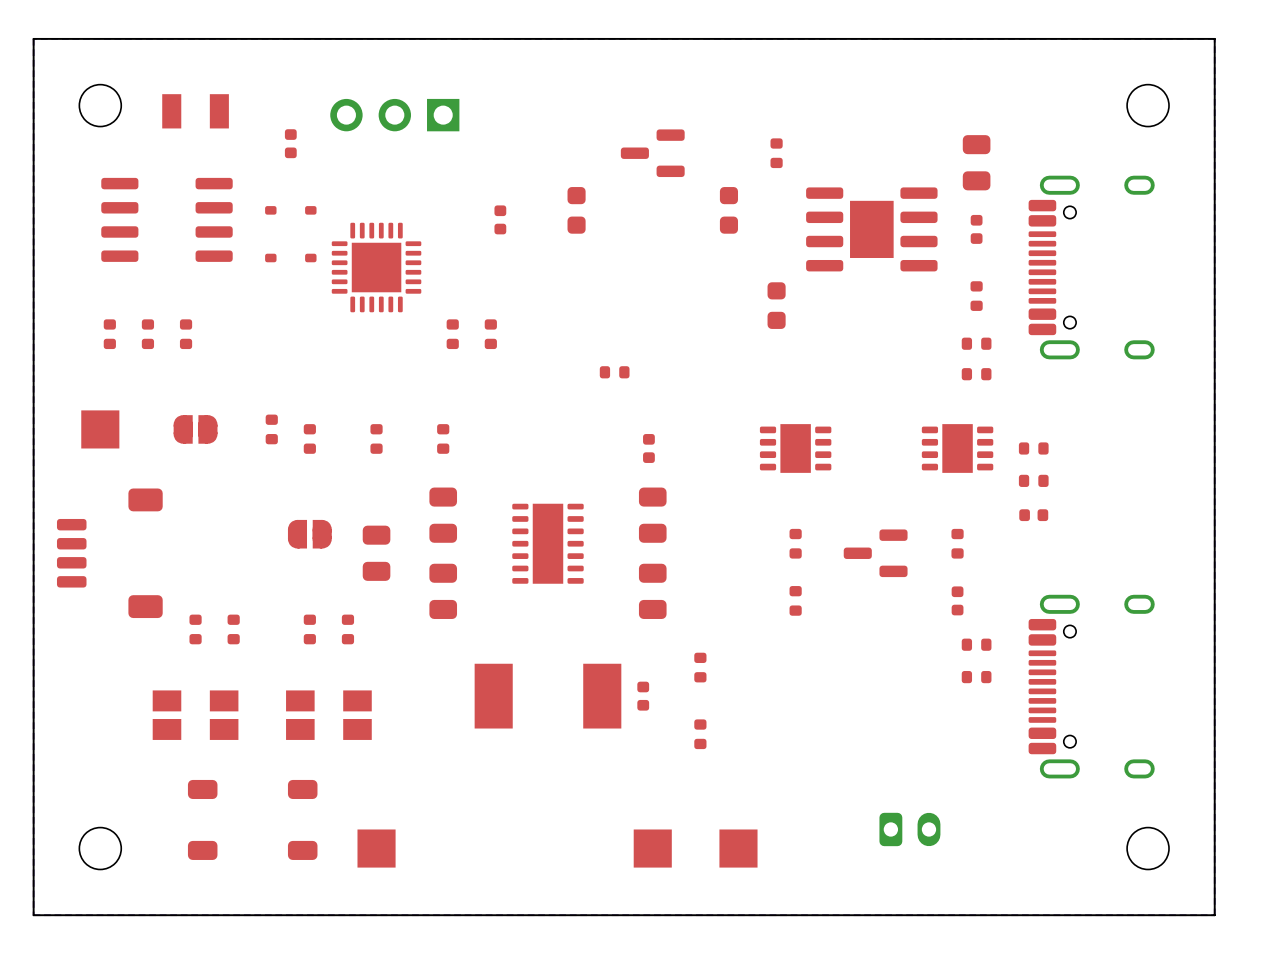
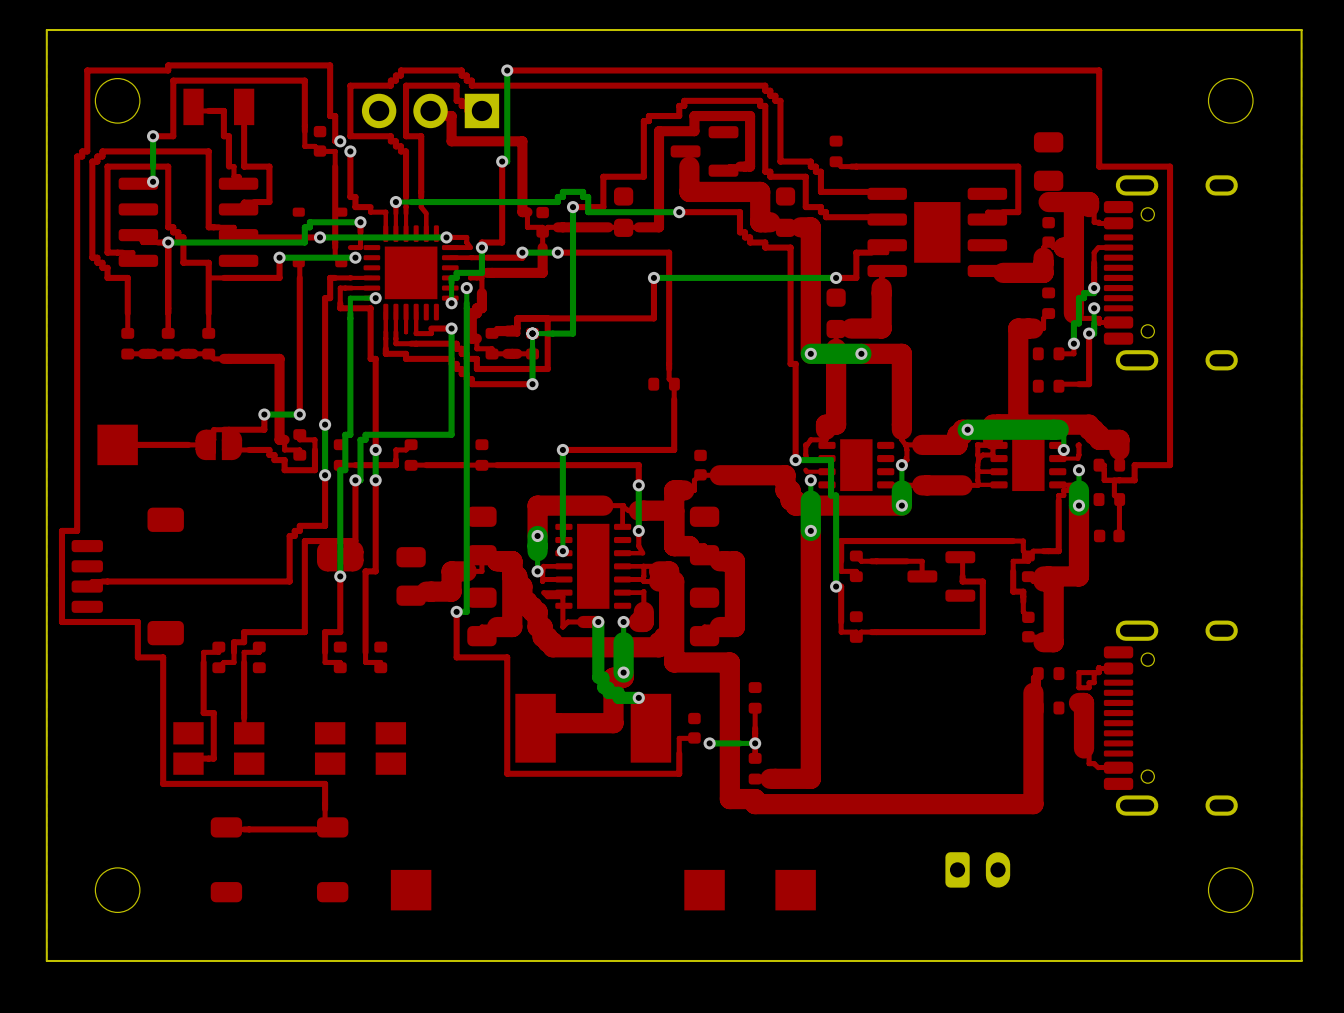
top track: none -> (507, 70) (1099, 70) (1099, 166) (1170, 166) (1170, 465) (1134, 465) (1134, 480) (1114, 480)
bottom track: none -> (507, 70) (507, 161) (502, 161)
via: none -> (507, 70)
top track: none -> (244, 105) (244, 166) (269, 166) (269, 202) (244, 202) (238, 209)
top track: none -> (193, 106) (198, 110) (223, 110) (223, 136) (228, 136) (228, 166) (234, 166) (234, 176) (239, 176) (238, 183)
top track: none -> (430, 110) (436, 116) (451, 116) (451, 141) (522, 141) (522, 212) (527, 212) (527, 227) (542, 227) (542, 272) (476, 272) (470, 277) (481, 277) (481, 308) (476, 308) (476, 313) (471, 313) (471, 338) (476, 338) (476, 348) (492, 348) (492, 354)
top track: none -> (481, 110) (466, 110) (466, 105) (461, 105) (461, 100) (456, 100) (456, 85) (406, 85) (406, 136) (421, 136) (421, 207) (426, 213) (426, 233)
top track: none -> (153, 136) (173, 136) (173, 80) (304, 80) (304, 146) (314, 146) (320, 151)
bottom track: none -> (153, 136) (153, 181)
via: none -> (153, 136)
top track: none -> (340, 141) (335, 141) (335, 116) (330, 116) (330, 65) (168, 65) (168, 70) (87, 70) (87, 151) (82, 151) (82, 156) (77, 156) (77, 530) (61, 530) (61, 621) (137, 621) (137, 657) (163, 657) (163, 783) (325, 783) (325, 824) (332, 827) (330, 829) (234, 829) (226, 827)
via: none -> (340, 141)
top track: none -> (320, 151) (335, 151) (335, 257) (340, 262)
top track: none -> (350, 151) (350, 196) (355, 196) (355, 207) (370, 207) (370, 212) (385, 212) (385, 233)
via: none -> (350, 151)
top track: none -> (684, 151) (689, 151) (689, 191) (760, 191) (760, 222) (780, 222) (785, 227) (810, 227) (810, 353)
top track: none -> (502, 161) (502, 242) (481, 242) (481, 247)
via: none -> (502, 161)
top track: none -> (836, 161) (841, 166) (1018, 166) (1018, 212) (987, 212) (987, 219)
top track: none -> (723, 170) (729, 166) (750, 166) (750, 116) (694, 116) (694, 131) (659, 131) (659, 227) (547, 227) (542, 231)
via: none -> (153, 181)
top track: none -> (887, 193) (886, 191) (820, 191) (820, 171) (815, 171) (815, 166) (810, 166) (810, 161) (780, 161) (780, 100) (775, 100) (775, 95) (770, 95) (770, 90) (765, 90) (765, 85) (471, 85) (471, 80) (466, 80) (466, 75) (461, 75) (461, 70) (400, 70) (400, 75) (395, 75) (395, 80) (390, 80) (390, 85) (350, 85) (350, 136) (390, 136) (390, 141) (395, 141) (395, 146) (400, 146) (400, 151) (406, 151) (406, 233)
top track: none -> (395, 202) (395, 233)
bottom track: none -> (395, 202) (557, 202) (557, 196) (562, 196) (562, 191) (583, 191) (583, 196) (588, 196) (588, 212) (679, 212)
via: none -> (395, 202)
top track: none -> (1063, 202) (1048, 202) (1089, 202) (1089, 207) (1094, 207) (1094, 222) (1118, 223)
top track: none -> (1073, 202) (1073, 313) (1078, 318) (1099, 318) (1099, 323) (1118, 322)
top track: none -> (573, 207) (603, 207) (603, 176) (643, 176) (643, 121) (648, 121) (648, 116) (679, 116) (679, 105) (684, 105) (684, 100) (760, 100) (760, 105) (765, 105) (765, 171) (770, 171) (770, 176) (805, 176) (805, 207) (820, 207) (820, 212) (825, 212) (825, 217) (886, 217) (887, 219)
bottom track: none -> (573, 207) (573, 333) (532, 333) (532, 384)
via: none -> (573, 207)
top track: none -> (679, 212) (739, 212) (739, 232) (745, 232) (745, 237) (750, 237) (750, 242) (765, 242) (765, 247) (790, 247) (790, 363) (795, 363) (795, 460)
via: none -> (679, 212)
top track: none -> (360, 222) (360, 247) (350, 247)
bottom track: none -> (360, 222) (309, 222) (309, 227) (304, 227) (304, 242) (168, 242)
via: none -> (360, 222)
top track: none -> (138, 235) (142, 242) (168, 242) (168, 333)
top track: none -> (320, 237) (239, 237) (234, 232) (234, 227) (208, 227) (208, 151) (102, 151) (102, 156) (97, 156) (97, 161) (92, 161) (92, 257) (97, 257) (97, 262) (102, 262) (102, 267) (107, 267) (107, 277) (127, 277) (127, 333)
via: none -> (320, 237)
top track: none -> (446, 237) (466, 237) (466, 242) (470, 247) (450, 247)
bottom track: none -> (446, 237) (320, 237)
via: none -> (446, 237)
via: none -> (168, 242)
top track: none -> (887, 245) (886, 252) (856, 252) (856, 277) (836, 277)
bottom track: none -> (481, 247) (481, 272) (456, 272) (456, 277) (451, 277) (451, 303)
via: none -> (481, 247)
top track: none -> (1073, 247) (1053, 247) (1048, 242) (1043, 247) (1043, 272) (987, 272) (987, 270)
top track: none -> (1118, 247) (1098, 247) (1094, 252) (1094, 288)
top track: none -> (522, 252) (522, 257) (450, 257)
via: none -> (522, 252)
top track: none -> (557, 252) (669, 252) (669, 379) (674, 384)
bottom track: none -> (557, 252) (522, 252)
via: none -> (557, 252)
top track: none -> (279, 257) (279, 277) (208, 277) (208, 262)
via: none -> (279, 257)
bottom track: none -> (355, 257) (279, 257)
via: none -> (355, 257)
top track: none -> (138, 260) (132, 257) (132, 252) (107, 252) (107, 166) (168, 166) (168, 227) (173, 227) (173, 232) (178, 232) (178, 237) (183, 237) (183, 262) (208, 262)
top track: none -> (208, 262) (208, 333)
top track: none -> (298, 262) (299, 414)
top track: none -> (887, 270) (881, 277) (881, 328) (836, 328) (836, 424) (825, 424) (825, 439) (810, 439) (805, 444) (806, 458)
top track: none -> (371, 277) (330, 277) (330, 298) (325, 298) (325, 424)
top track: none -> (653, 277) (653, 318) (517, 318) (517, 333) (492, 333)
via: none -> (653, 277)
bottom track: none -> (836, 277) (653, 277)
via: none -> (836, 277)
top track: none -> (371, 288) (340, 288) (340, 308) (370, 308) (370, 358) (375, 358) (375, 449)
bottom track: none -> (466, 288) (466, 611) (456, 611)
via: none -> (466, 288)
bottom track: none -> (1094, 288) (1094, 293) (1084, 293) (1084, 298) (1078, 298) (1078, 323) (1073, 323) (1073, 343)
via: none -> (1094, 288)
bottom track: none -> (375, 298) (350, 298) (350, 434) (345, 434) (345, 470) (340, 470) (340, 576)
via: none -> (375, 298)
via: none -> (451, 303)
bottom track: none -> (1094, 308) (1094, 333) (1089, 333)
via: none -> (1094, 308)
top track: none -> (385, 312) (385, 353) (406, 353) (406, 358) (451, 358) (451, 363) (456, 363) (456, 369) (461, 369) (461, 374) (466, 374) (466, 379) (471, 379) (471, 384) (532, 384)
top track: none -> (395, 312) (395, 343) (456, 343) (456, 348) (461, 348) (461, 353) (466, 353) (466, 358) (476, 358) (476, 369) (547, 369) (547, 318)
top track: none -> (406, 312) (406, 332)
top track: none -> (416, 312) (416, 333) (431, 333) (431, 328) (451, 328)
top track: none -> (1048, 313) (1043, 318) (1043, 328) (1018, 328) (1018, 424)
bottom track: none -> (451, 328) (451, 434) (365, 434) (365, 439) (360, 439) (360, 480) (355, 480)
via: none -> (451, 328)
top track: none -> (517, 328) (497, 328) (492, 333)
via: none -> (532, 333)
top track: none -> (1089, 333) (1089, 384) (1058, 384) (1058, 386)
via: none -> (1089, 333)
top track: none -> (1073, 343) (1073, 353) (1058, 353)
via: none -> (1073, 343)
top track: none -> (127, 354) (203, 353) (208, 354) (213, 358) (279, 358) (279, 439) (284, 439) (284, 449) (299, 449) (299, 455)
top track: none -> (492, 353) (532, 354)
via: none -> (810, 353)
top track: none -> (861, 353) (901, 353) (901, 439) (905, 445)
bottom track: none -> (861, 353) (810, 353)
via: none -> (861, 353)
via: none -> (532, 384)
top track: none -> (674, 384) (674, 449) (562, 449)
top track: none -> (264, 414) (264, 429) (213, 429) (213, 439) (208, 439) (205, 444) (117, 444)
via: none -> (264, 414)
bottom track: none -> (299, 414) (264, 414)
via: none -> (299, 414)
bottom track: none -> (325, 424) (325, 475)
via: none -> (325, 424)
top track: none -> (967, 429) (962, 429) (962, 434) (957, 434) (957, 444) (905, 445)
bottom track: none -> (967, 429) (1063, 429) (1063, 449)
via: none -> (967, 429)
top track: none -> (299, 434) (299, 439) (314, 439) (314, 470) (284, 470) (284, 460) (274, 460) (274, 455) (269, 455) (269, 449) (239, 449) (231, 444)
top track: none -> (411, 444) (406, 449) (395, 449) (395, 465) (340, 465)
top track: none -> (905, 445) (906, 460) (905, 458)
top track: none -> (977, 444) (978, 458)
top track: none -> (1077, 445) (1077, 458) (1057, 458)
bottom track: none -> (375, 449) (375, 480)
via: none -> (375, 449)
bottom track: none -> (562, 449) (562, 551)
via: none -> (562, 449)
via: none -> (1063, 449)
top track: none -> (978, 458) (978, 484)
top track: none -> (978, 458) (982, 455) (992, 455) (992, 424) (1089, 424) (1089, 429) (1094, 429) (1094, 434) (1099, 434) (1099, 439) (1119, 439) (1119, 465)
bottom track: none -> (795, 460) (831, 460) (831, 495) (836, 495) (836, 586)
via: none -> (795, 460)
top track: none -> (411, 465) (481, 465)
top track: none -> (481, 465) (638, 465) (638, 485)
bottom track: none -> (901, 465) (901, 505)
via: none -> (901, 465)
top track: none -> (805, 470) (827, 471)
top track: none -> (977, 470) (999, 471)
bottom track: none -> (1078, 470) (1078, 505)
via: none -> (1078, 470)
top track: none -> (1104, 470) (1099, 465) (1104, 465) (1104, 480) (1114, 480)
top track: none -> (325, 475) (325, 525) (299, 525) (299, 530) (294, 530) (294, 535) (289, 535) (289, 581) (92, 581) (87, 586)
via: none -> (325, 475)
top track: none -> (355, 480) (355, 541) (304, 541) (304, 632) (244, 632) (244, 642) (234, 642) (234, 662) (223, 662) (218, 667)
via: none -> (355, 480)
top track: none -> (375, 480) (375, 571) (365, 571) (365, 662) (380, 662) (380, 667)
via: none -> (375, 480)
bottom track: none -> (810, 480) (810, 530)
via: none -> (810, 480)
top track: none -> (1114, 480) (1114, 495) (1119, 499) (1119, 535)
bottom track: none -> (638, 485) (638, 530)
via: none -> (638, 485)
top track: none -> (978, 484) (885, 484)
top track: none -> (999, 484) (978, 484)
top track: none -> (1057, 484) (1078, 485) (1068, 485) (1068, 490) (1063, 490) (1063, 495) (1058, 495) (1058, 551) (1033, 551) (1028, 556)
top track: none -> (901, 505) (795, 505) (795, 500) (790, 500) (790, 490) (785, 490) (785, 475) (700, 474) (694, 480) (694, 490) (674, 490) (674, 546) (704, 546) (704, 556)
via: none -> (901, 505)
top track: none -> (1078, 505) (1078, 576) (1028, 576) (1033, 581) (1053, 581) (1053, 642) (1043, 642) (1043, 637) (1028, 637)
via: none -> (1078, 505)
top track: none -> (622, 506) (622, 526)
top track: none -> (622, 506) (537, 505) (537, 535)
top track: none -> (622, 506) (628, 510) (674, 510)
top track: none -> (638, 530) (638, 546) (642, 553) (622, 553)
via: none -> (638, 530)
top track: none -> (810, 530) (810, 778) (755, 779)
via: none -> (810, 530)
bottom track: none -> (537, 535) (537, 571)
via: none -> (537, 535)
via: none -> (562, 551)
top track: none -> (704, 555) (709, 561) (734, 561) (734, 627) (704, 627) (704, 637)
top track: none -> (856, 556) (861, 561) (922, 561) (922, 576)
top track: none -> (1028, 556) (1028, 561) (1013, 561) (1013, 591) (1023, 591) (1023, 611) (1028, 617)
top track: none -> (1028, 556) (1023, 551) (1023, 541) (841, 541) (841, 571) (856, 571) (856, 576)
top track: none -> (960, 557) (962, 556) (962, 581) (982, 581) (982, 632) (861, 632) (856, 637) (856, 632) (841, 632) (841, 586) (836, 586)
top track: none -> (543, 566) (542, 581) (543, 579) (563, 579)
top track: none -> (563, 566) (543, 566)
top track: none -> (622, 566) (659, 566) (659, 571) (669, 571) (669, 637) (664, 637) (664, 642) (659, 642) (659, 647) (552, 647) (552, 642) (547, 642) (547, 637) (542, 637) (542, 627) (537, 627) (537, 611) (532, 611) (532, 606) (527, 606) (527, 601) (522, 601) (522, 586) (517, 586) (517, 576) (512, 576)
top track: none -> (643, 566) (642, 579)
via: none -> (537, 571)
top track: none -> (340, 576) (340, 632) (325, 632) (325, 662) (340, 662) (340, 667)
via: none -> (340, 576)
top track: none -> (642, 579) (622, 579)
top track: none -> (642, 579) (643, 581) (674, 581) (674, 662) (729, 662) (729, 799) (755, 799) (755, 804) (1033, 804) (1033, 677) (1038, 673) (1038, 708)
via: none -> (836, 586)
top track: none -> (563, 592) (543, 592) (547, 596) (562, 596) (562, 627) (567, 621) (598, 621)
top track: none -> (622, 592) (643, 591) (643, 621) (628, 621) (623, 627) (623, 621)
top track: none -> (411, 595) (416, 591) (451, 591) (451, 571) (481, 571) (481, 555) (486, 561) (512, 561) (512, 627) (481, 627) (481, 637)
top track: none -> (456, 611) (456, 657) (507, 657) (507, 773) (679, 773) (679, 738) (694, 738)
via: none -> (456, 611)
bottom track: none -> (598, 621) (598, 677) (603, 677) (603, 687) (608, 687) (608, 692) (618, 692) (618, 697) (638, 697)
via: none -> (598, 621)
bottom track: none -> (623, 621) (623, 672)
via: none -> (623, 621)
top track: none -> (218, 647) (218, 652) (203, 652) (203, 713) (213, 713) (213, 758) (193, 758) (188, 763)
top track: none -> (259, 647) (259, 652) (244, 652) (244, 728) (249, 733)
top track: none -> (1118, 668) (1099, 667) (1099, 672) (1078, 672) (1078, 687) (1089, 687) (1089, 682) (1094, 682) (1094, 672)
top track: none -> (623, 672) (623, 677) (613, 677) (613, 723) (542, 723) (535, 728)
via: none -> (623, 672)
via: none -> (638, 697)
top track: none -> (1078, 702) (1084, 702) (1084, 748) (1089, 748) (1089, 763) (1094, 763) (1098, 767) (1118, 767)
top track: none -> (755, 708) (755, 758)
via: none -> (709, 743)
bottom track: none -> (755, 743) (709, 743)
via: none -> (755, 743)

